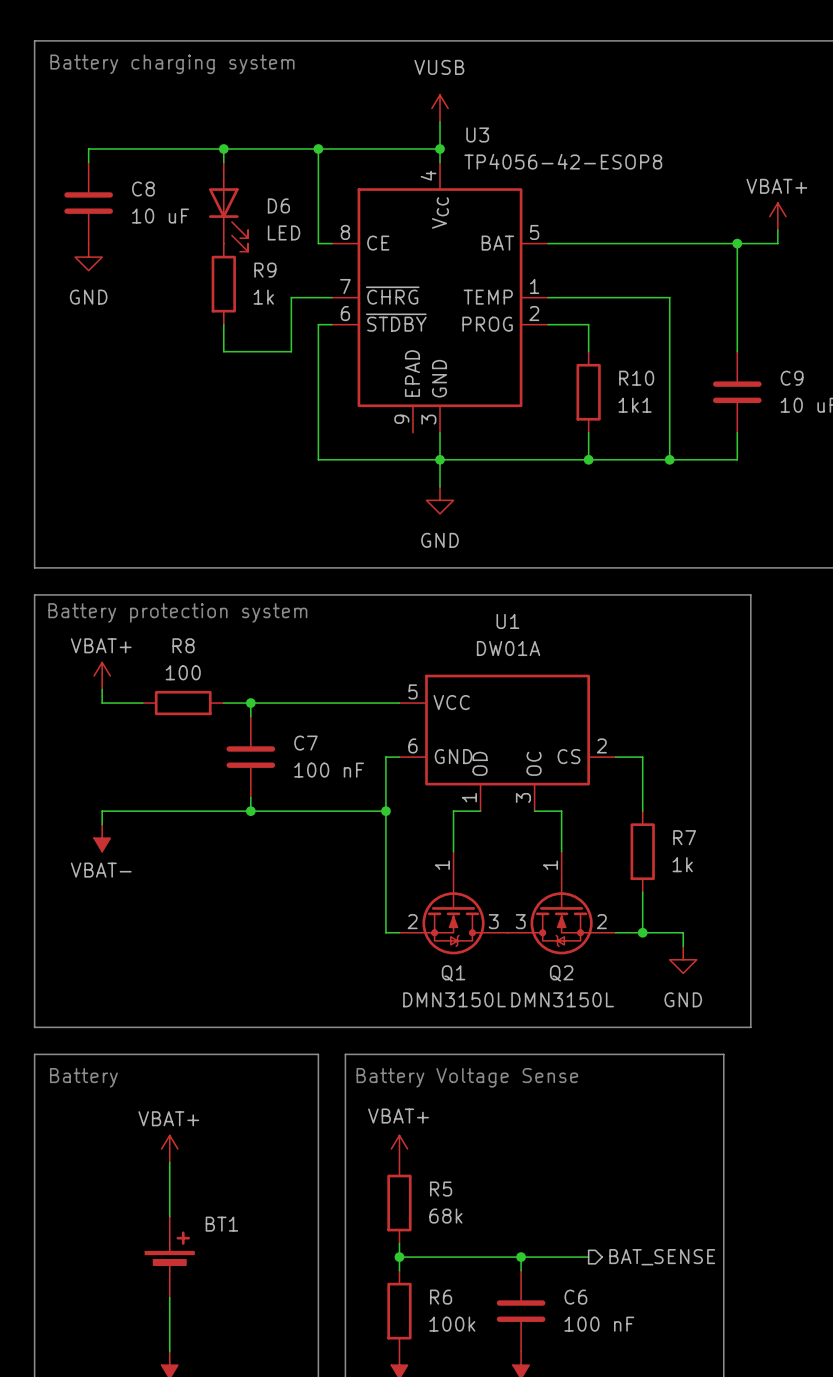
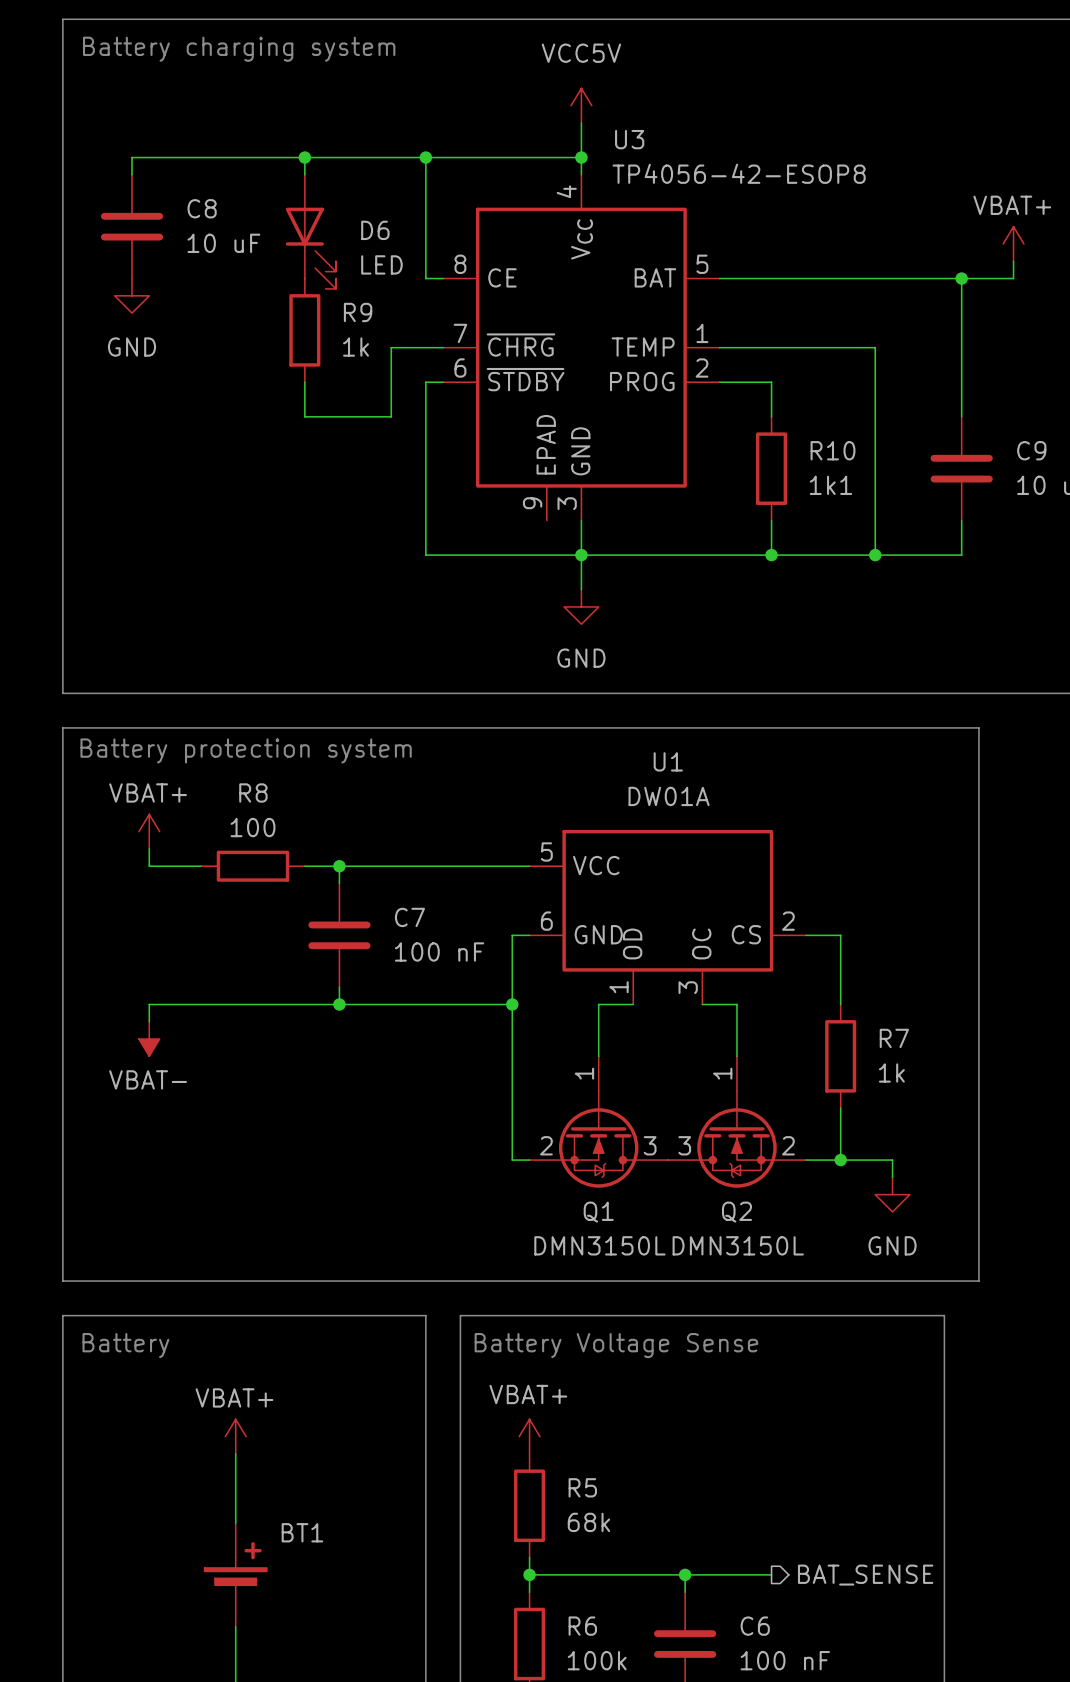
power symbol: VUSB (440, 108) -> VCC5V (581, 105)

